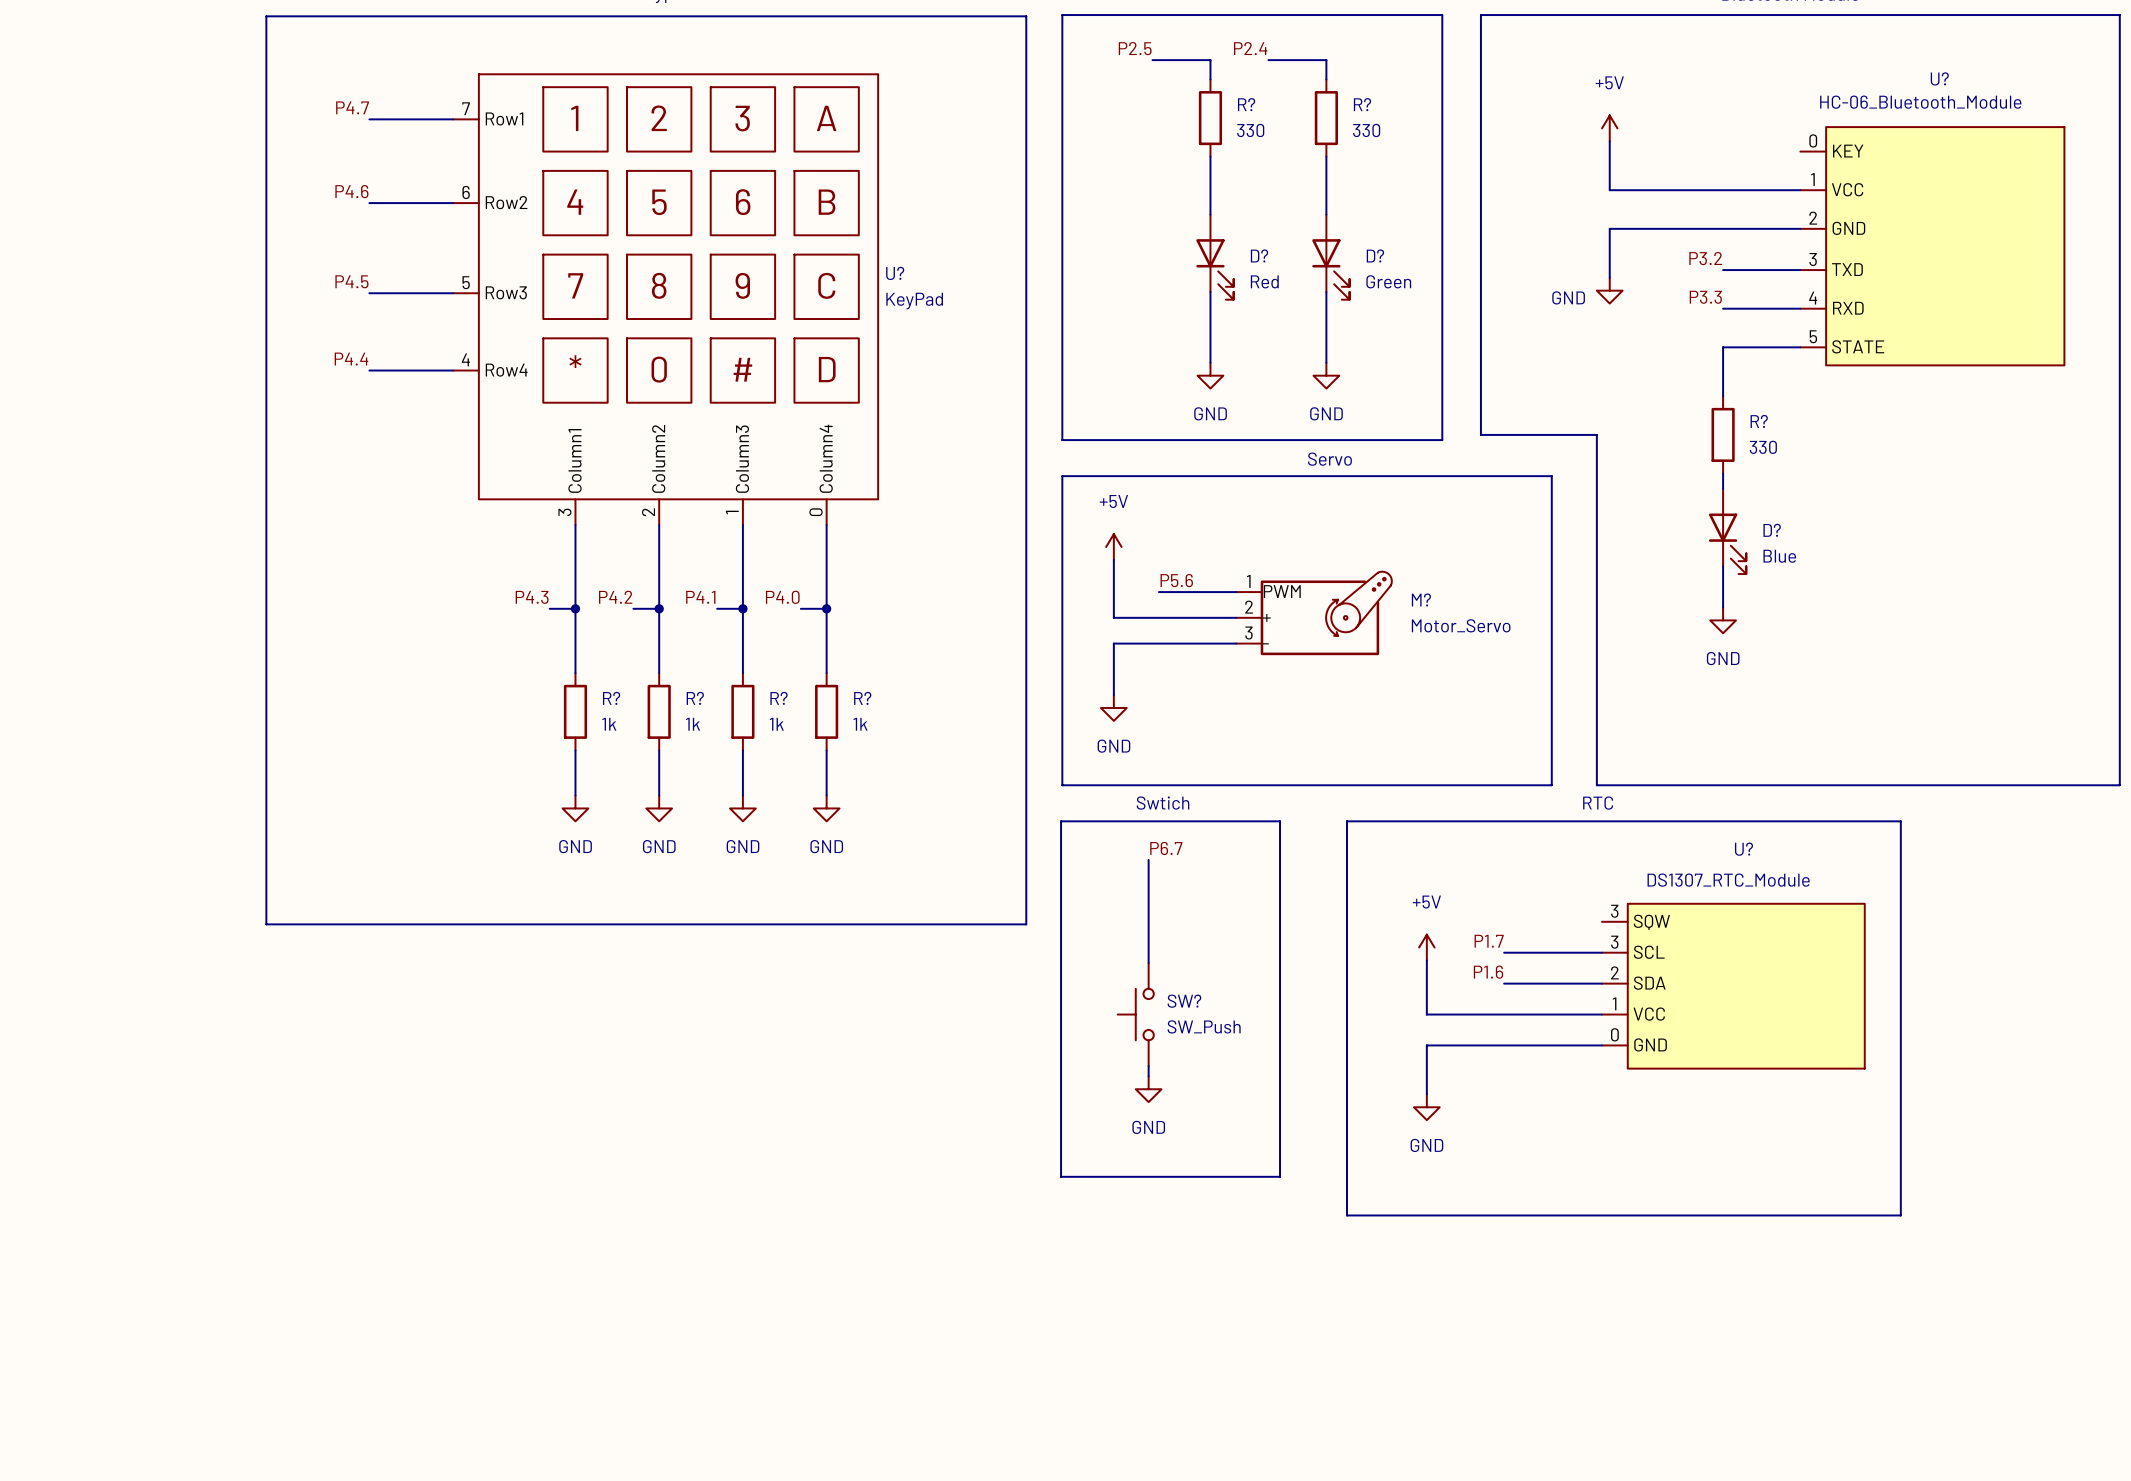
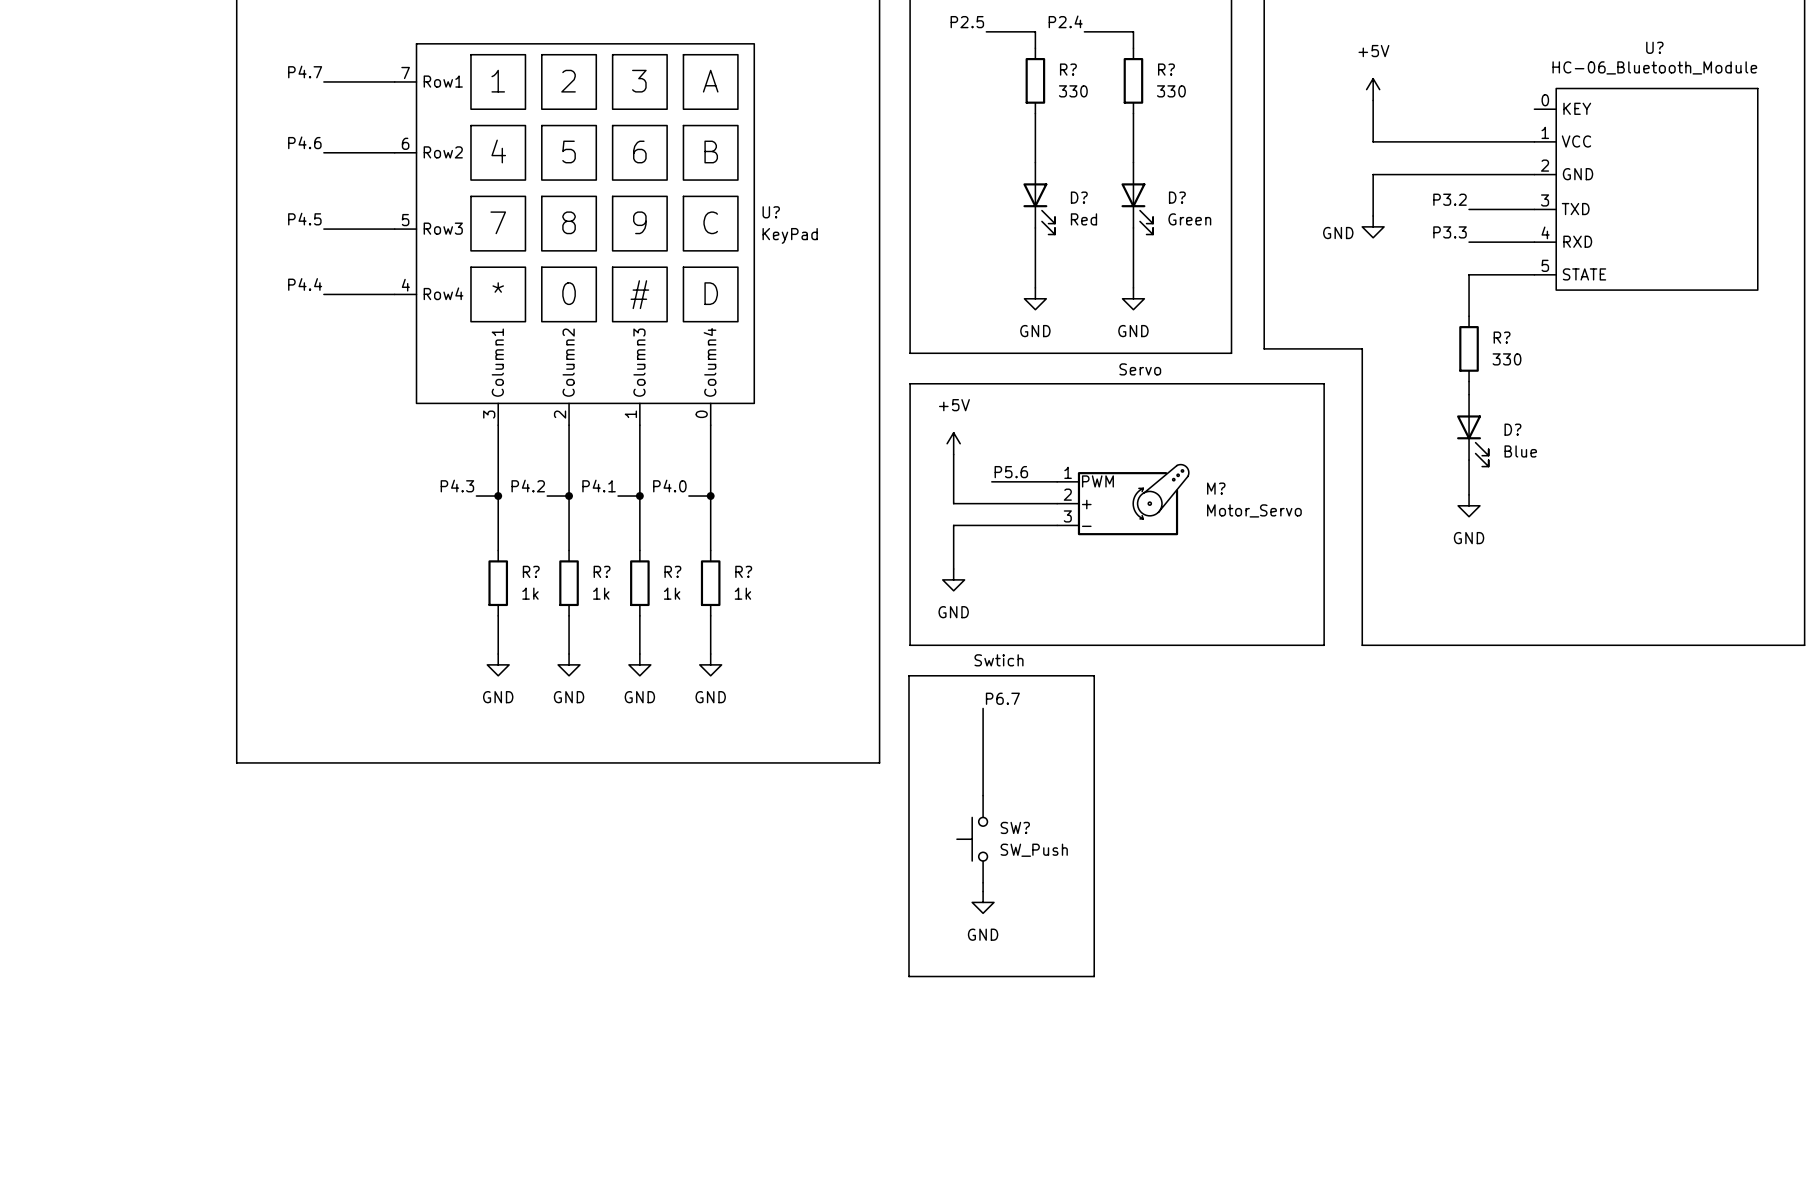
text: RTC (1598, 803) -> none
line: (1346, 821) (1346, 1215) (1900, 1215) (1900, 821) (1346, 821) -> none
label: P1.7 (1489, 941) -> none
power symbol: +5V (1426, 947) -> none
wire: (1504, 952) (1602, 952) -> none
wire: (1426, 960) (1426, 1014) (1602, 1014) -> none
label: P1.6 (1488, 972) -> none
wire: (1504, 983) (1602, 983) -> none
U?: DS1307_RTC_Module (1733, 986) -> none
wire: (1602, 1045) (1426, 1045) (1426, 1094) -> none
power symbol: GND (1426, 1107) -> none

